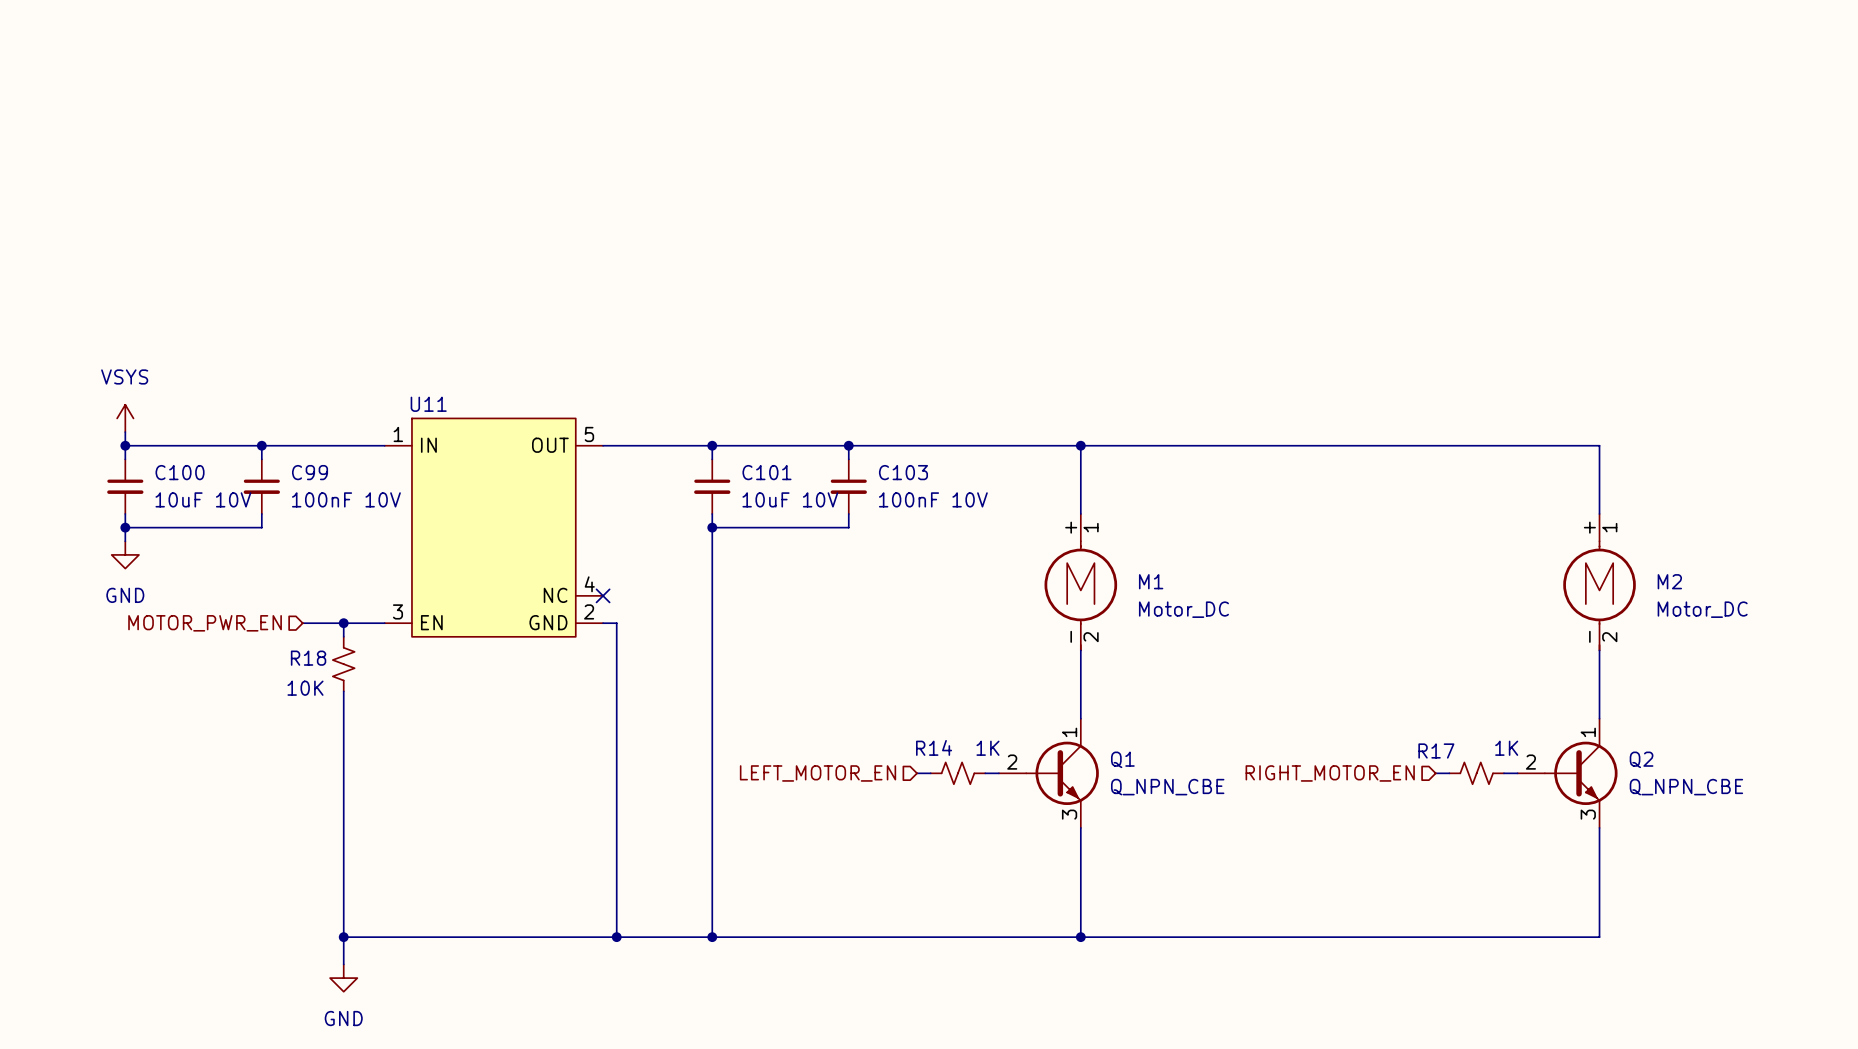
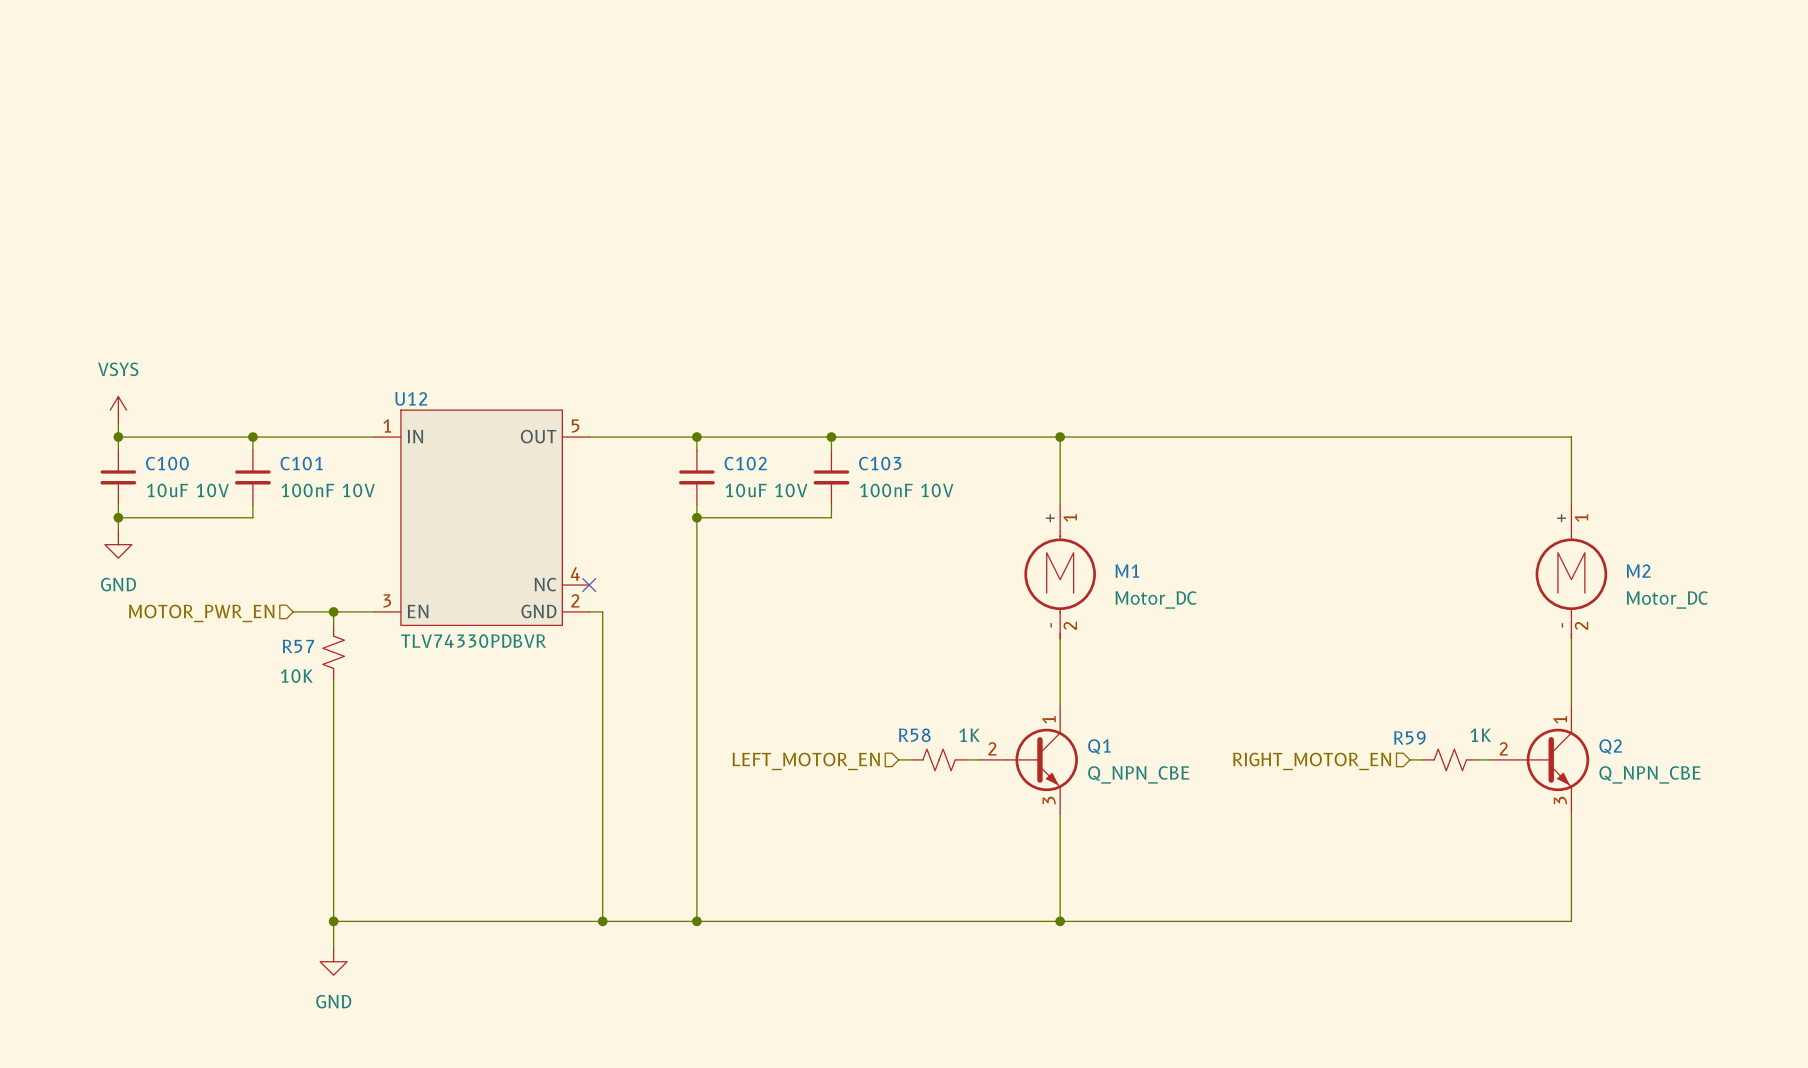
U11 name: U11 (428, 404) -> U12 (411, 398)
C99 name: C99 (310, 472) -> C101 (301, 463)
C101 name: C101 (766, 472) -> C102 (745, 463)
U11 value: none -> TLV74330PDBVR (473, 641)
R18 name: R18 (308, 658) -> R57 (298, 646)
R14 name: R14 (934, 747) -> R58 (914, 735)
R17 name: R17 (1436, 750) -> R59 (1409, 737)

